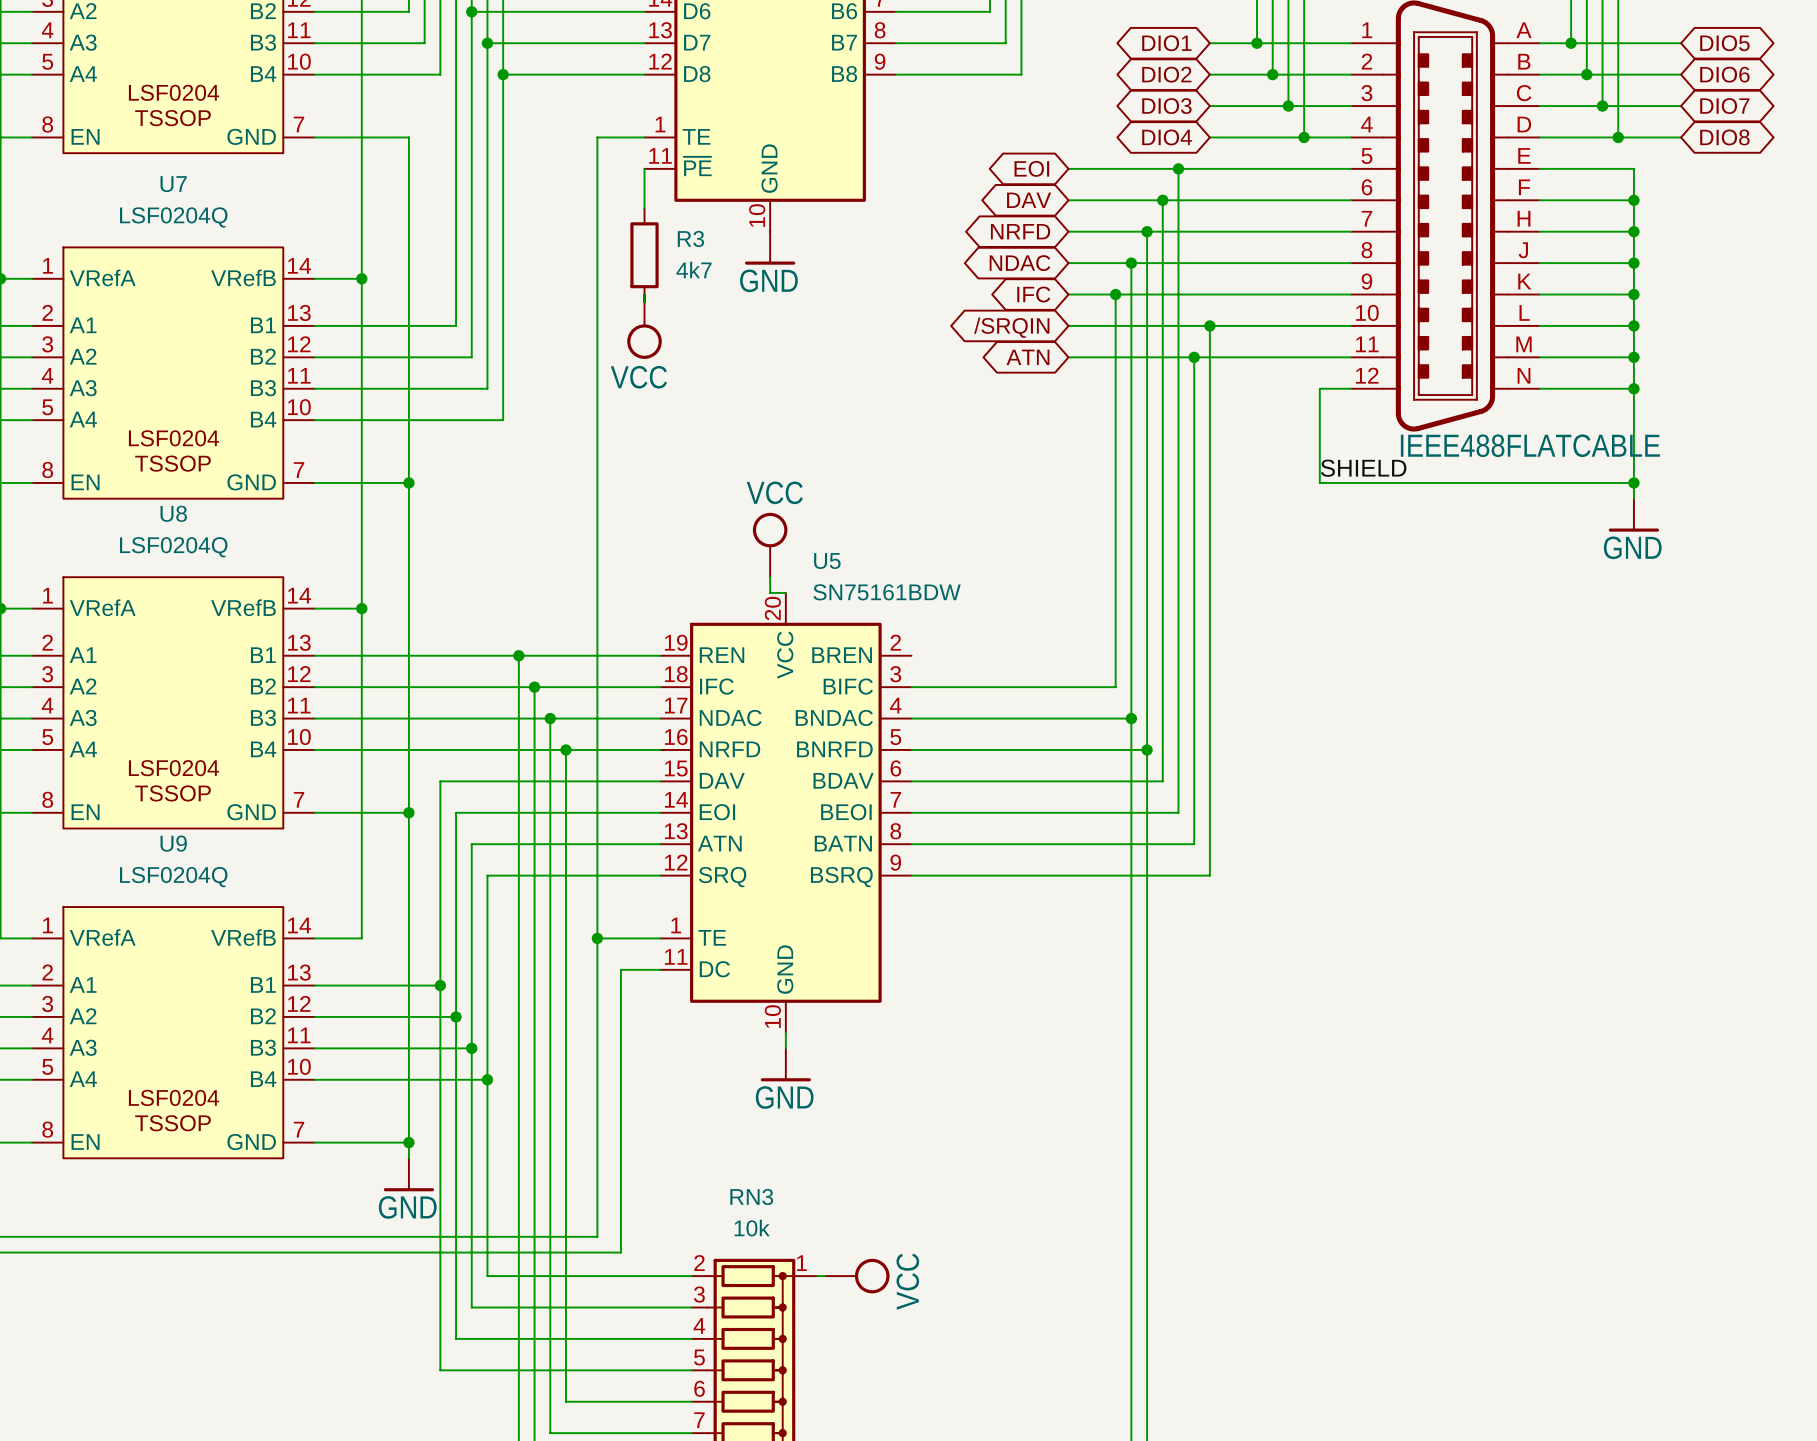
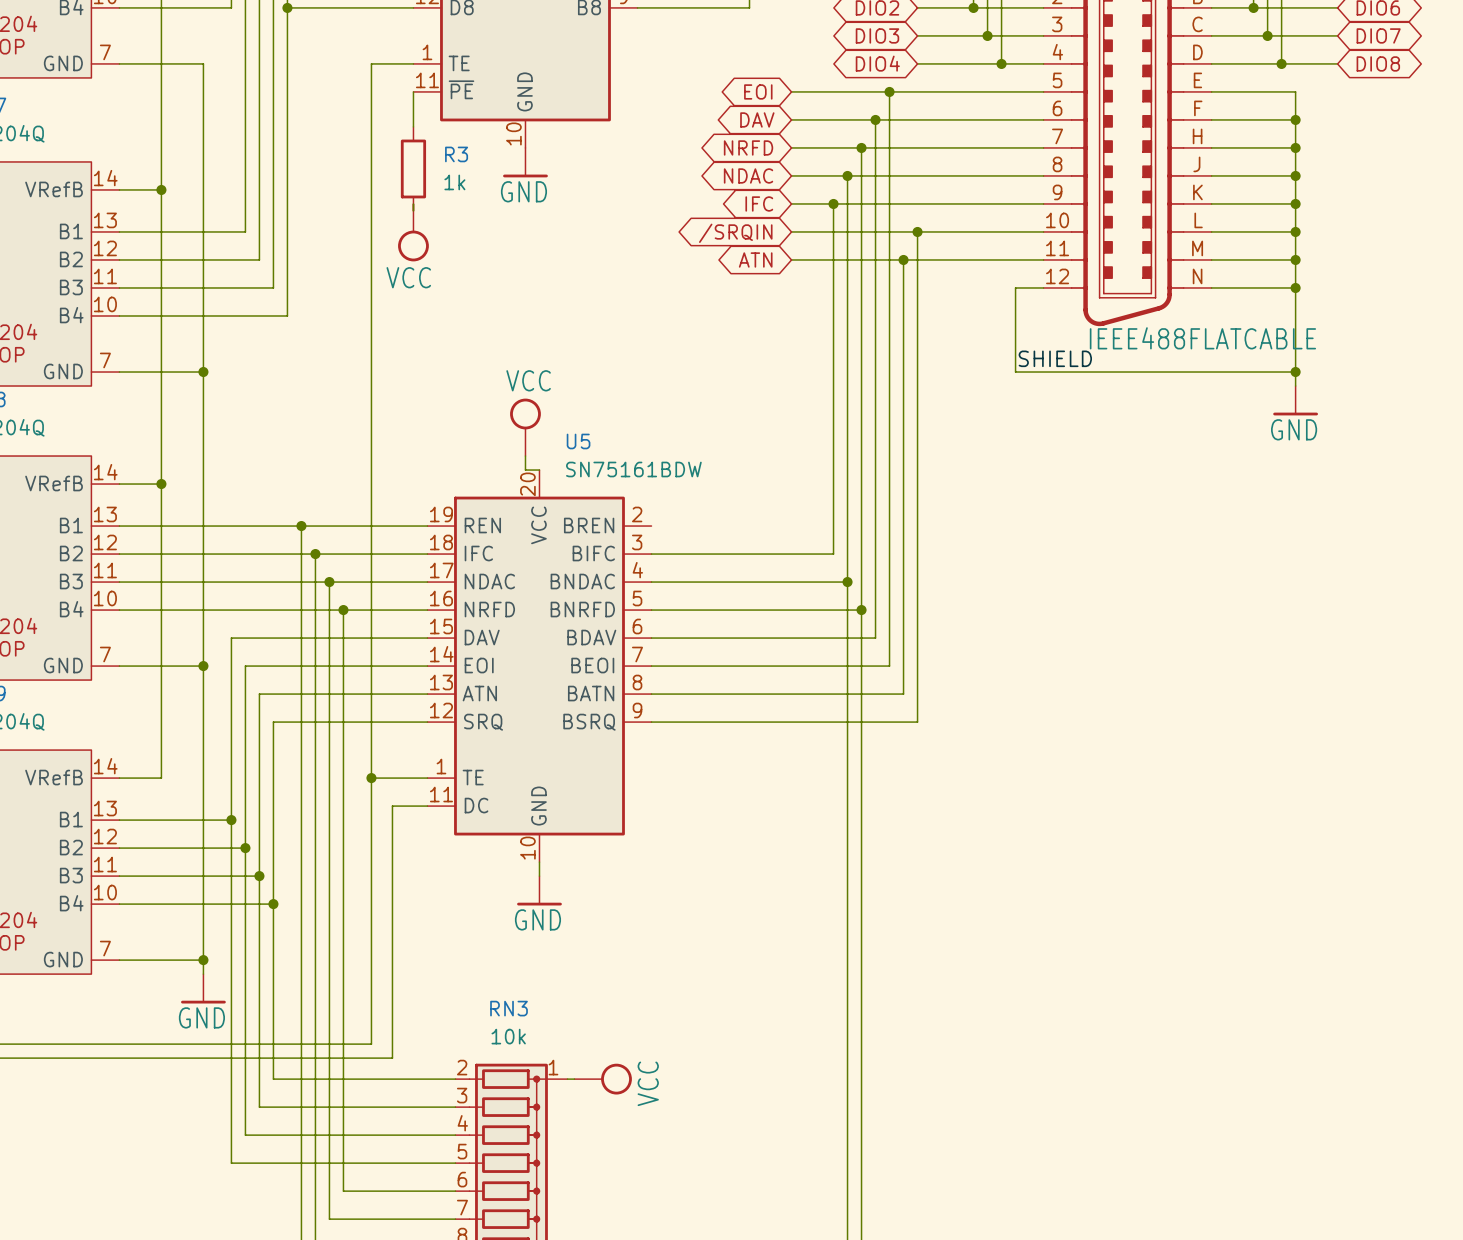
R3 value: 4k7 (694, 269) -> 1k (454, 182)

